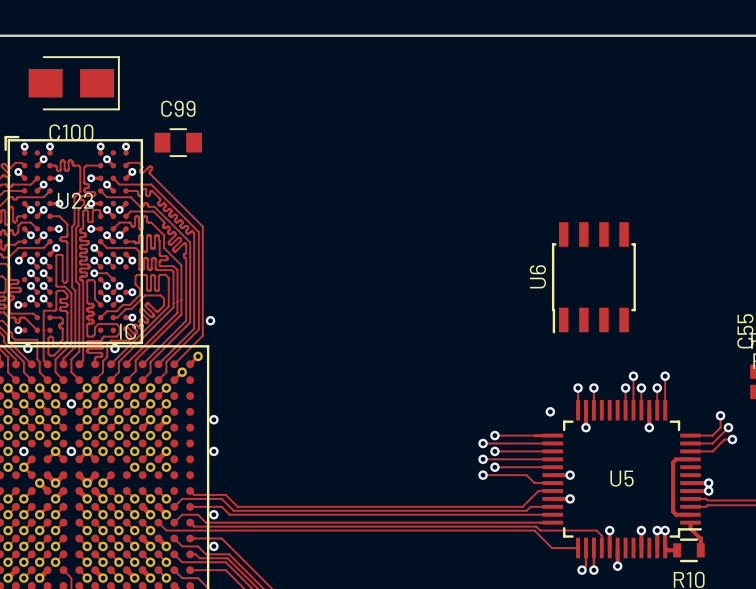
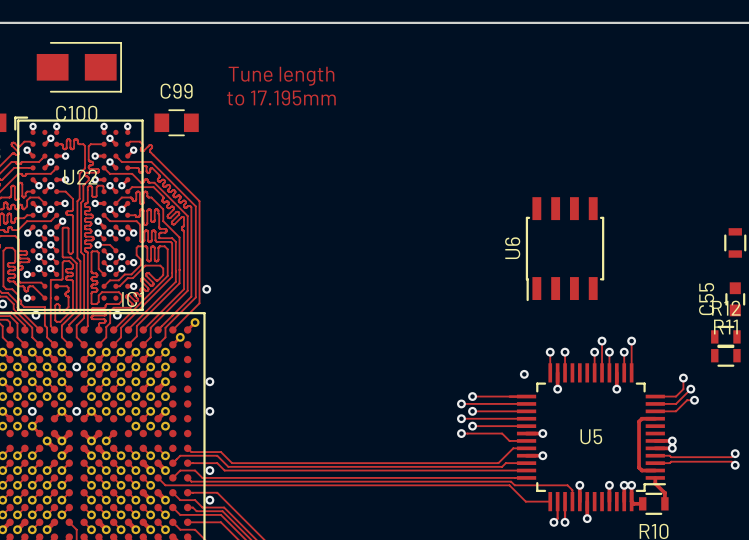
text: none -> Tune length (281, 76)
text: none -> to 17.195mm (281, 97)

